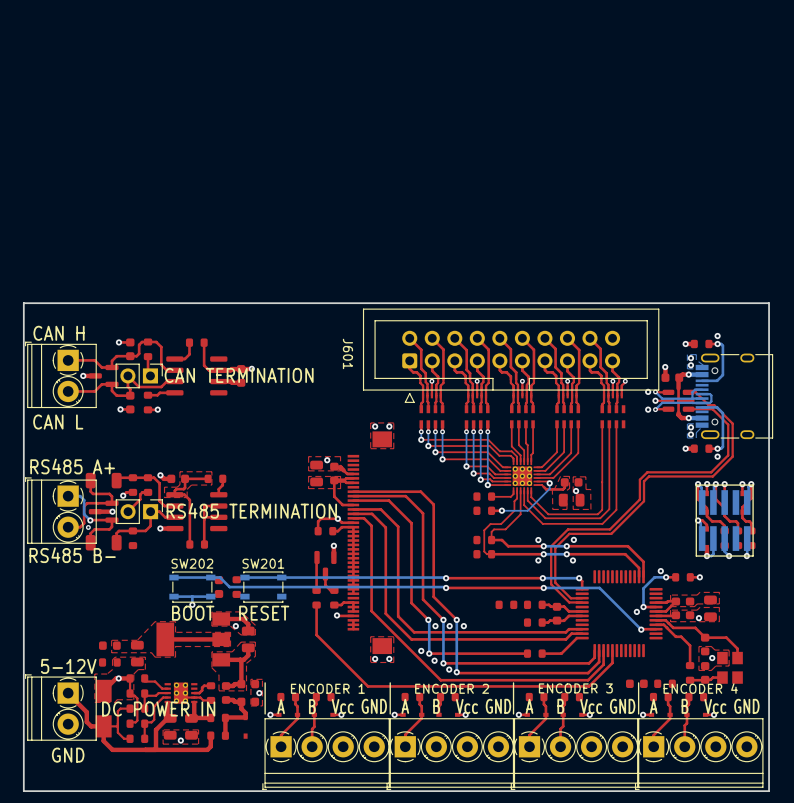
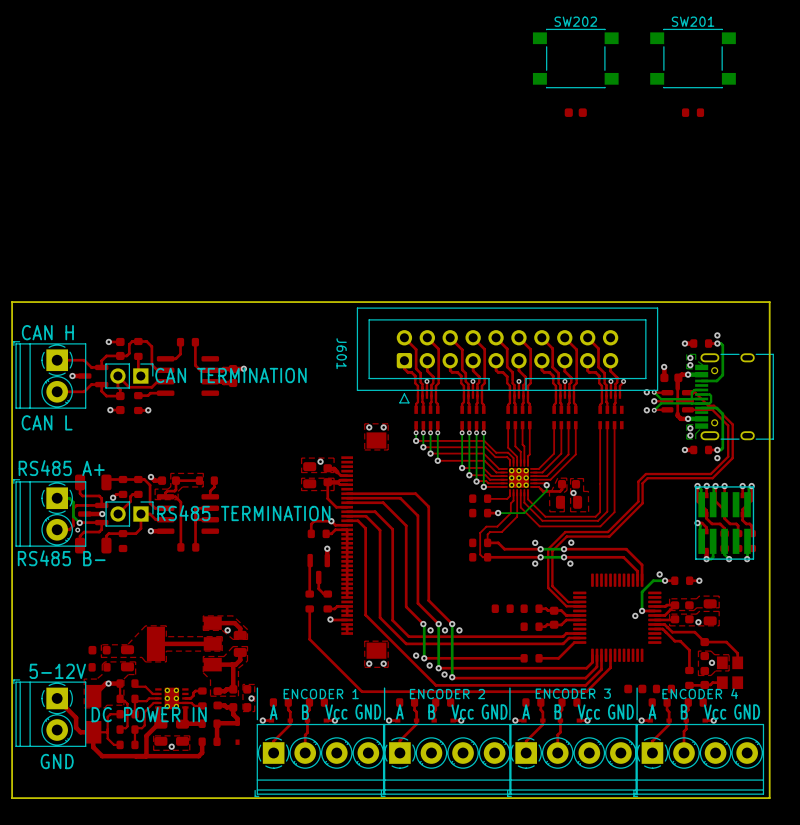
part: none -> (575, 112)
part: none -> (693, 112)
SW202 footprint: [169, 571, 216, 603] -> [532, 28, 619, 89]
SW201 footprint: [240, 571, 287, 603] -> [650, 28, 736, 89]
bottom track: (173, 577) (220, 577) (229, 587) (446, 587) -> none
bottom track: (244, 577) (446, 578) -> none
via: (446, 578) -> none
top track: (542, 578) (446, 578) -> none
via: (542, 578) -> none
top track: (579, 578) (582, 581) (582, 589) -> none
bottom track: (579, 578) (542, 578) -> none
via: (579, 578) -> none
part: (218, 587) -> none
part: (236, 587) -> none
via: (446, 587) -> none
top track: (543, 587) (446, 587) -> none
bottom track: (543, 587) (599, 587) (641, 629) -> none
via: (543, 587) -> none
bottom track: (192, 596) (192, 604) -> none
bottom track: (210, 596) (173, 596) -> none
via: (192, 604) -> none
text: BOOT (193, 613) -> none
text: RESET (264, 613) -> none
via: (641, 629) -> none
top track: (656, 629) (641, 629) -> none

